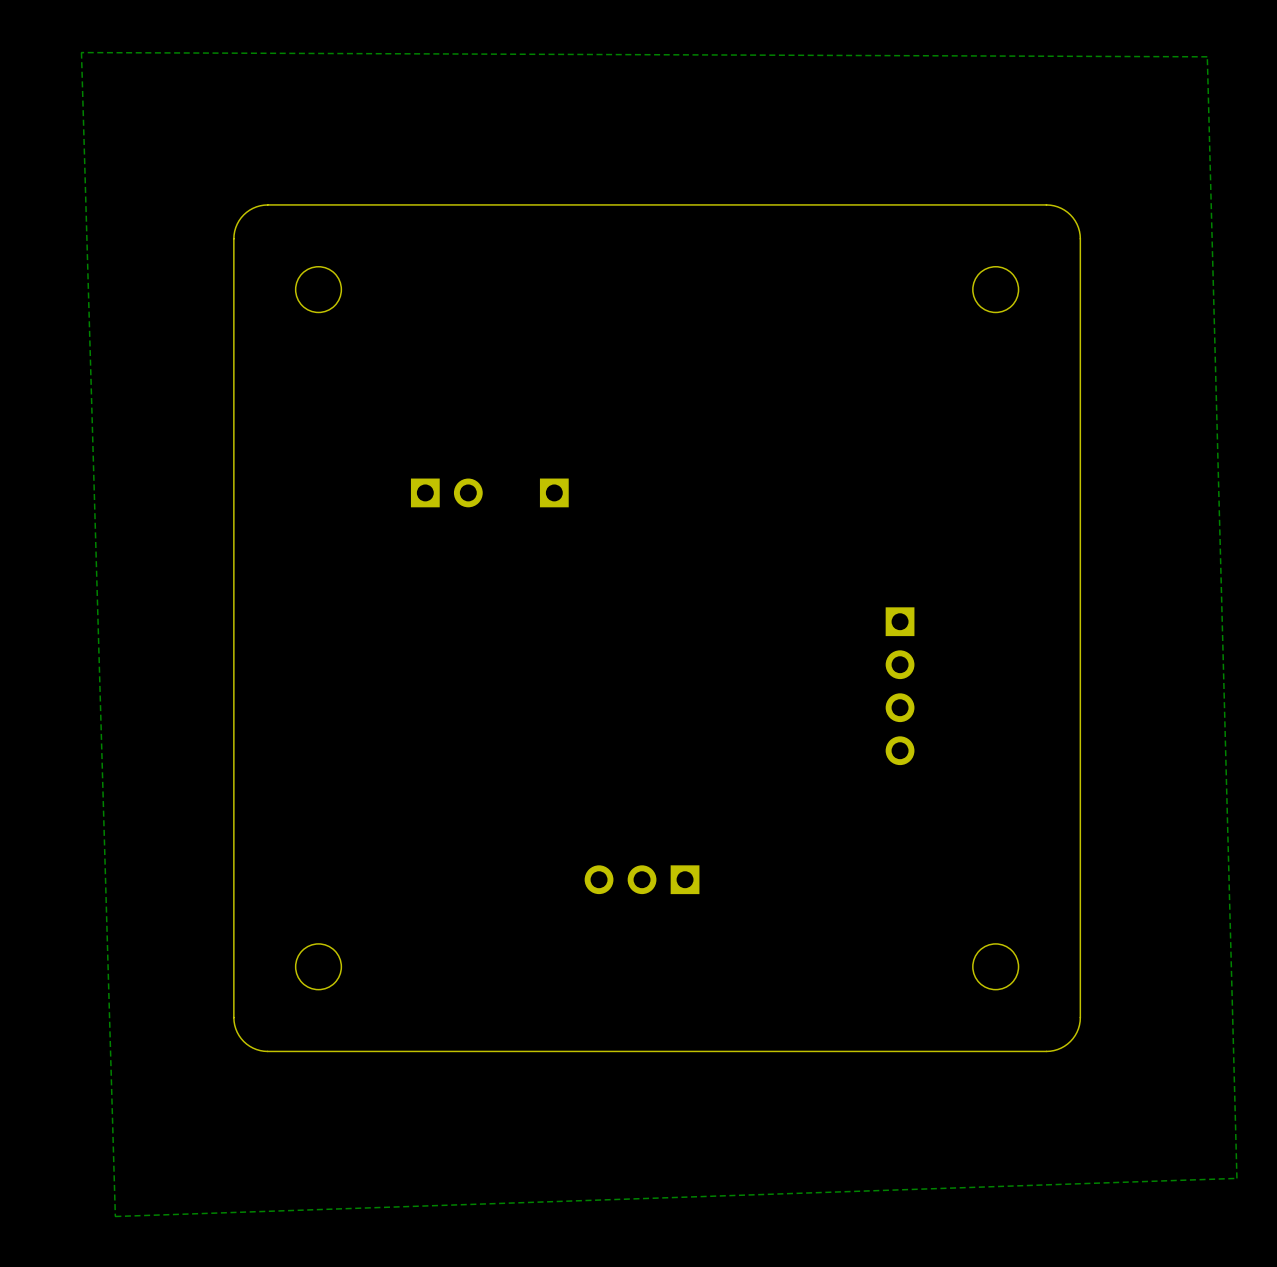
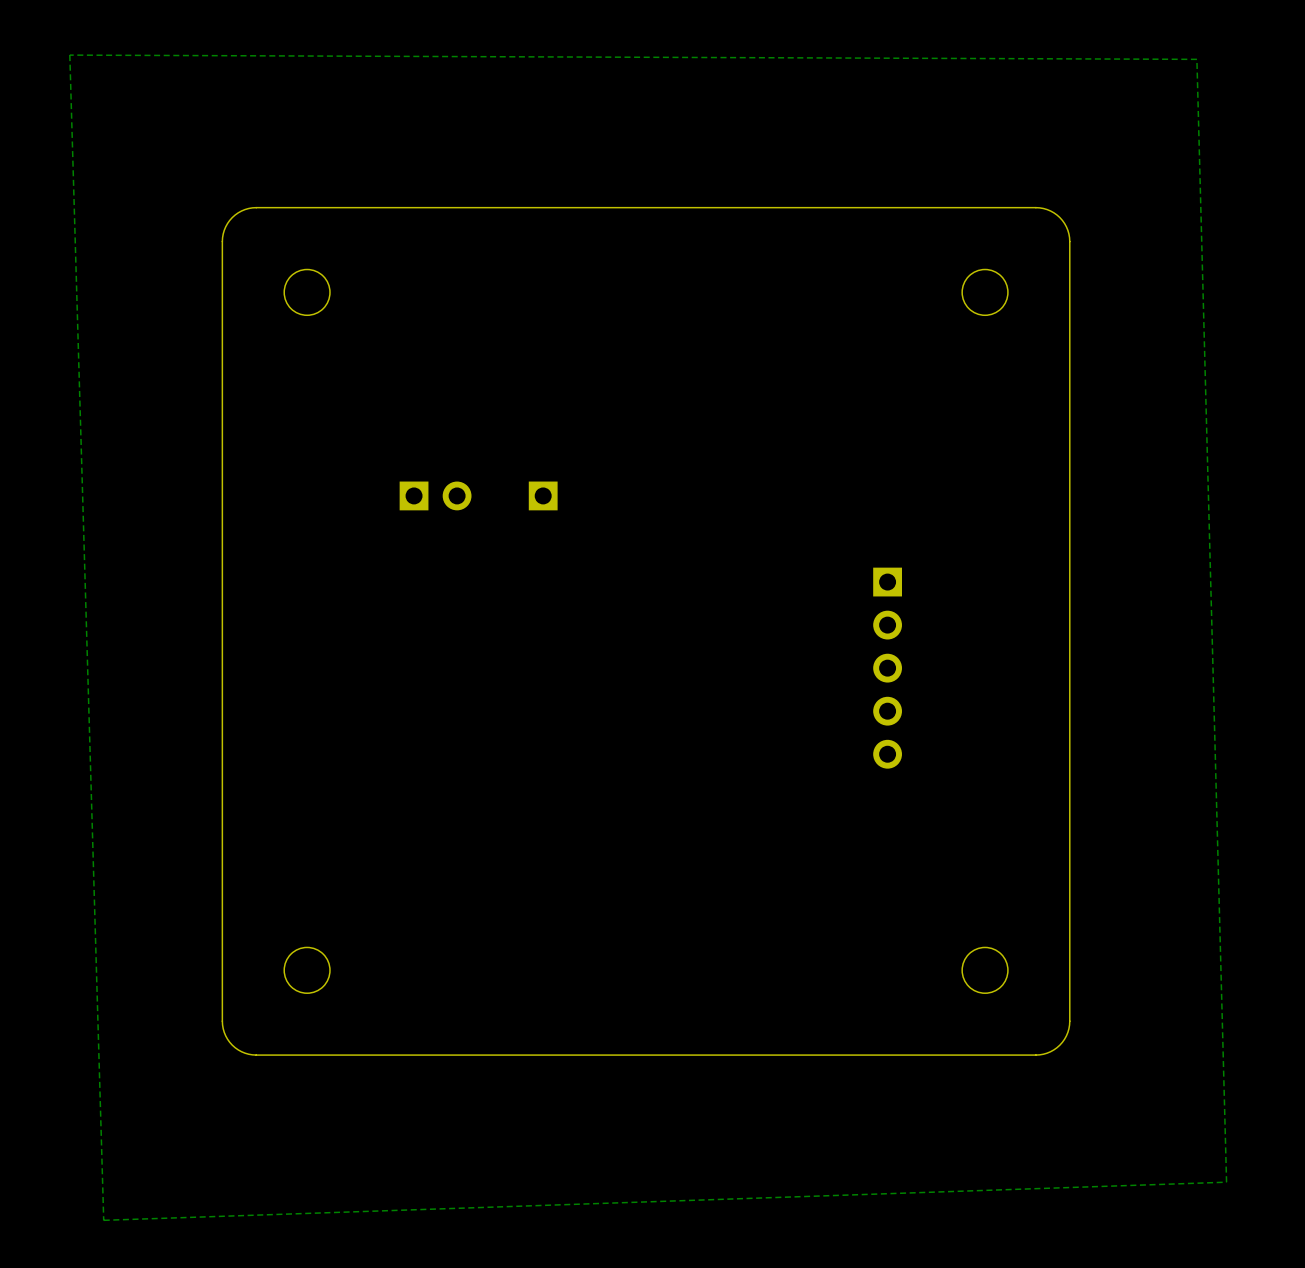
part: none -> (887, 668)
part: (900, 686) -> none
part: (642, 879) -> none

